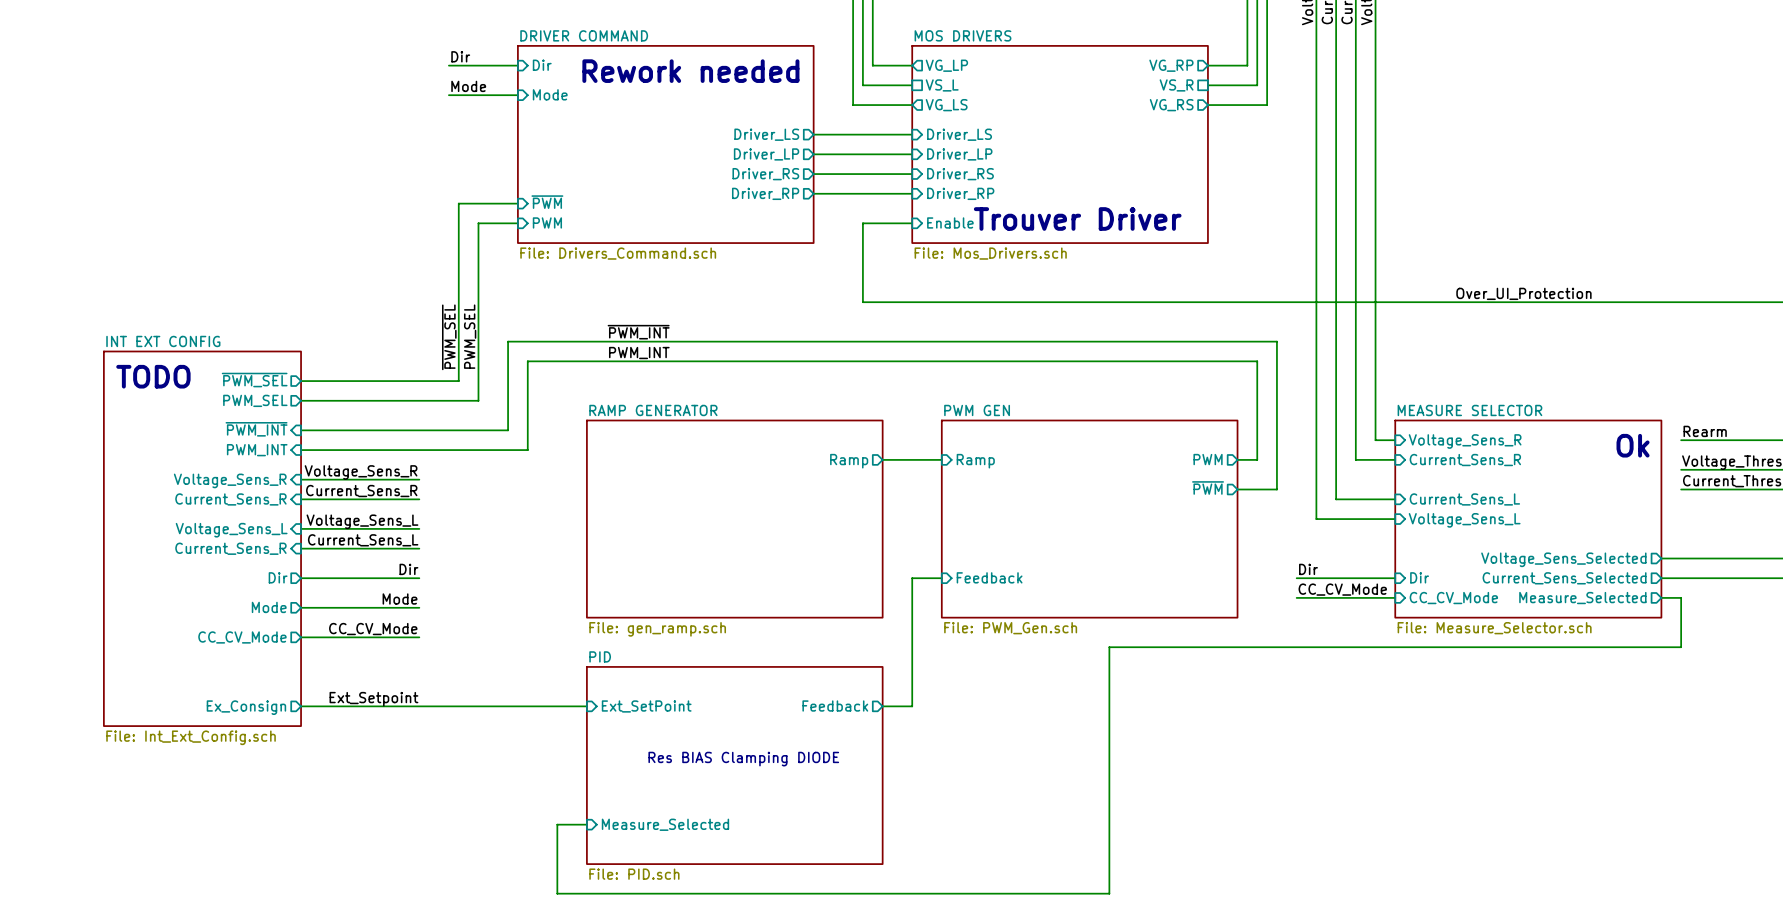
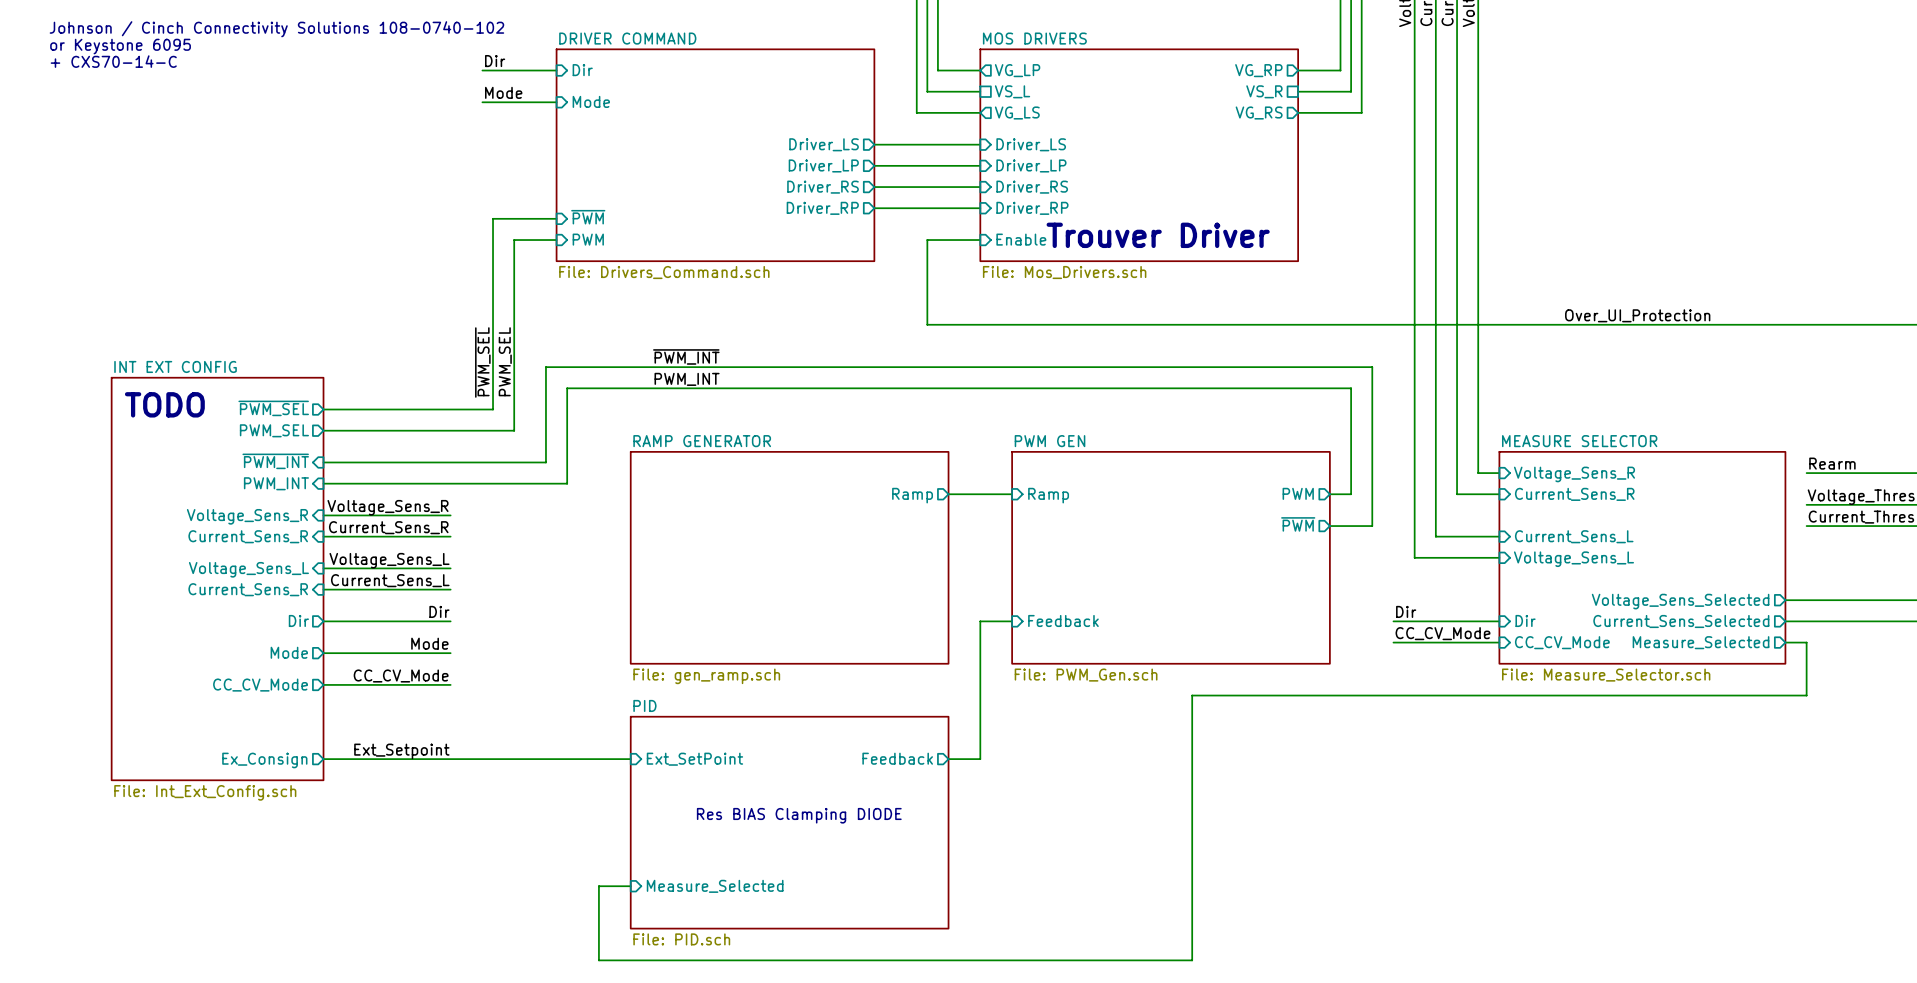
text: none -> Johnson / Cinch Connectivity Solutions 108-0740-102 (276, 29)
text: none -> or Keystone 6095 (120, 46)
text: none -> + CXS70-14-C (113, 61)
text: Rework needed (690, 71) -> none
text: Ok (1633, 445) -> none

